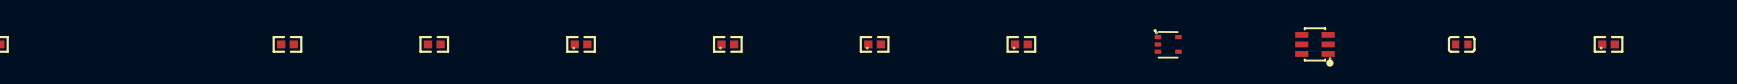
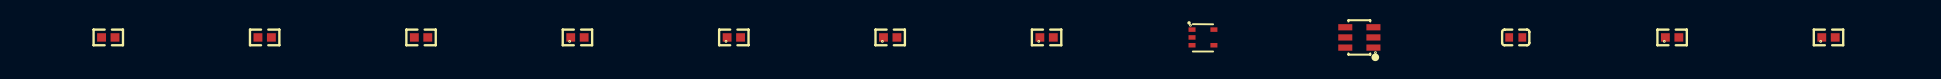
part: none -> (108, 37)

